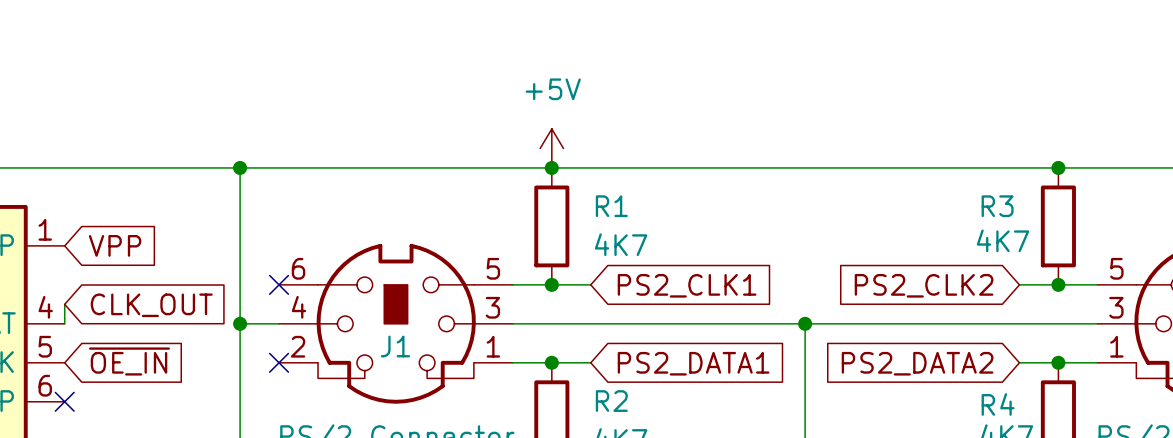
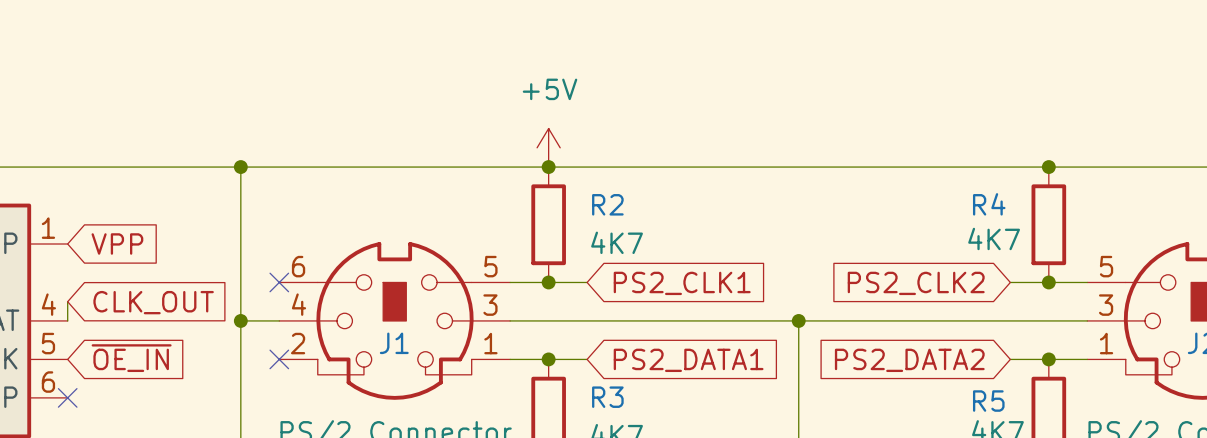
R1 name: R1 (611, 206) -> R2 (607, 204)
R3 name: R3 (997, 206) -> R4 (989, 204)
R2 name: R2 (611, 401) -> R3 (607, 397)
R4 name: R4 (998, 404) -> R5 (988, 401)

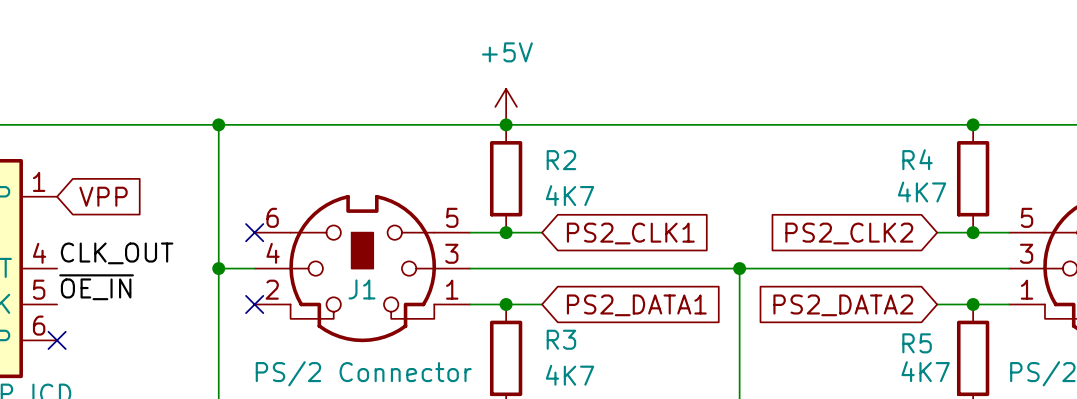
wire: (67, 301) (67, 320) -> none
global label: CLK_OUT (153, 302) -> none
label: none -> CLK_OUT (117, 253)
label: none -> ~{OE_IN} (96, 287)
global label: ~{OE_IN} (131, 358) -> none

